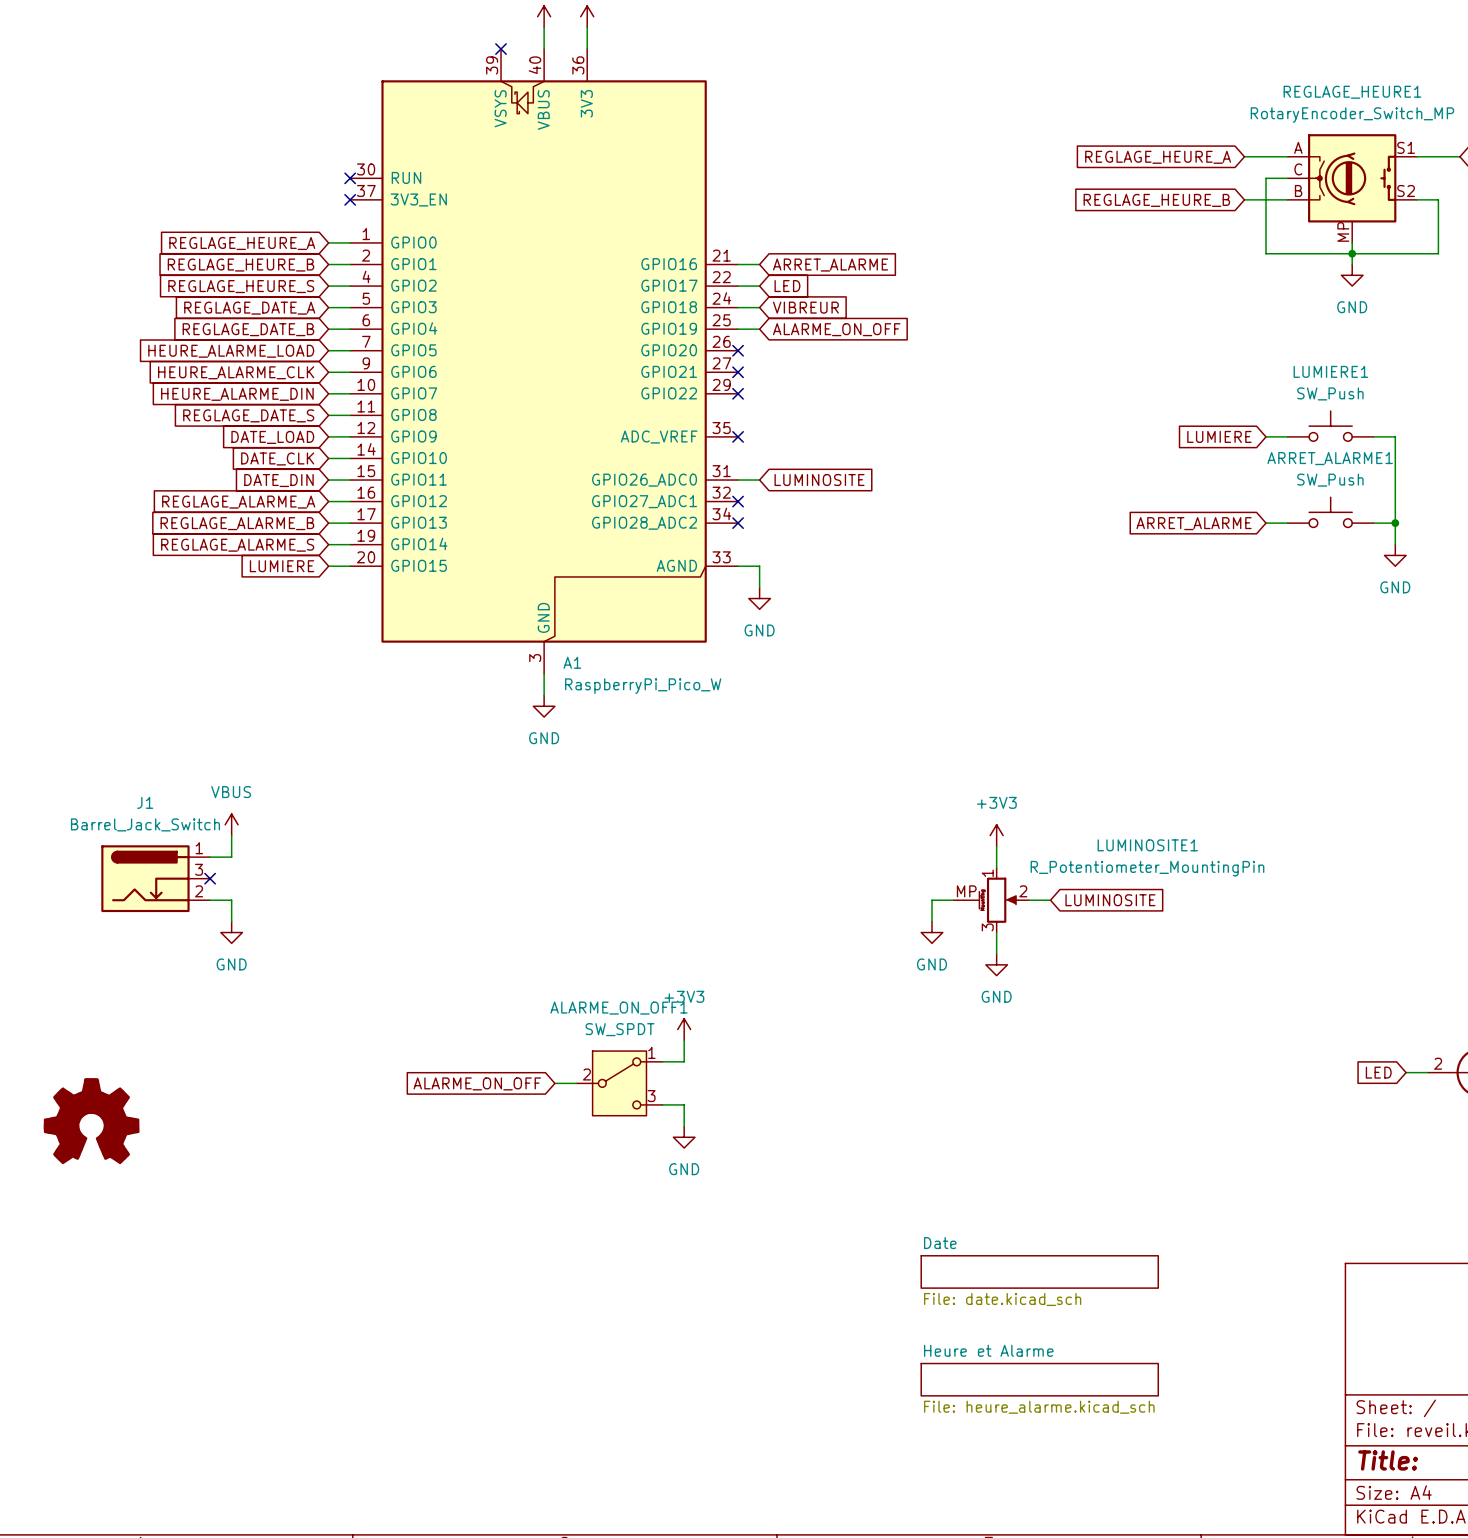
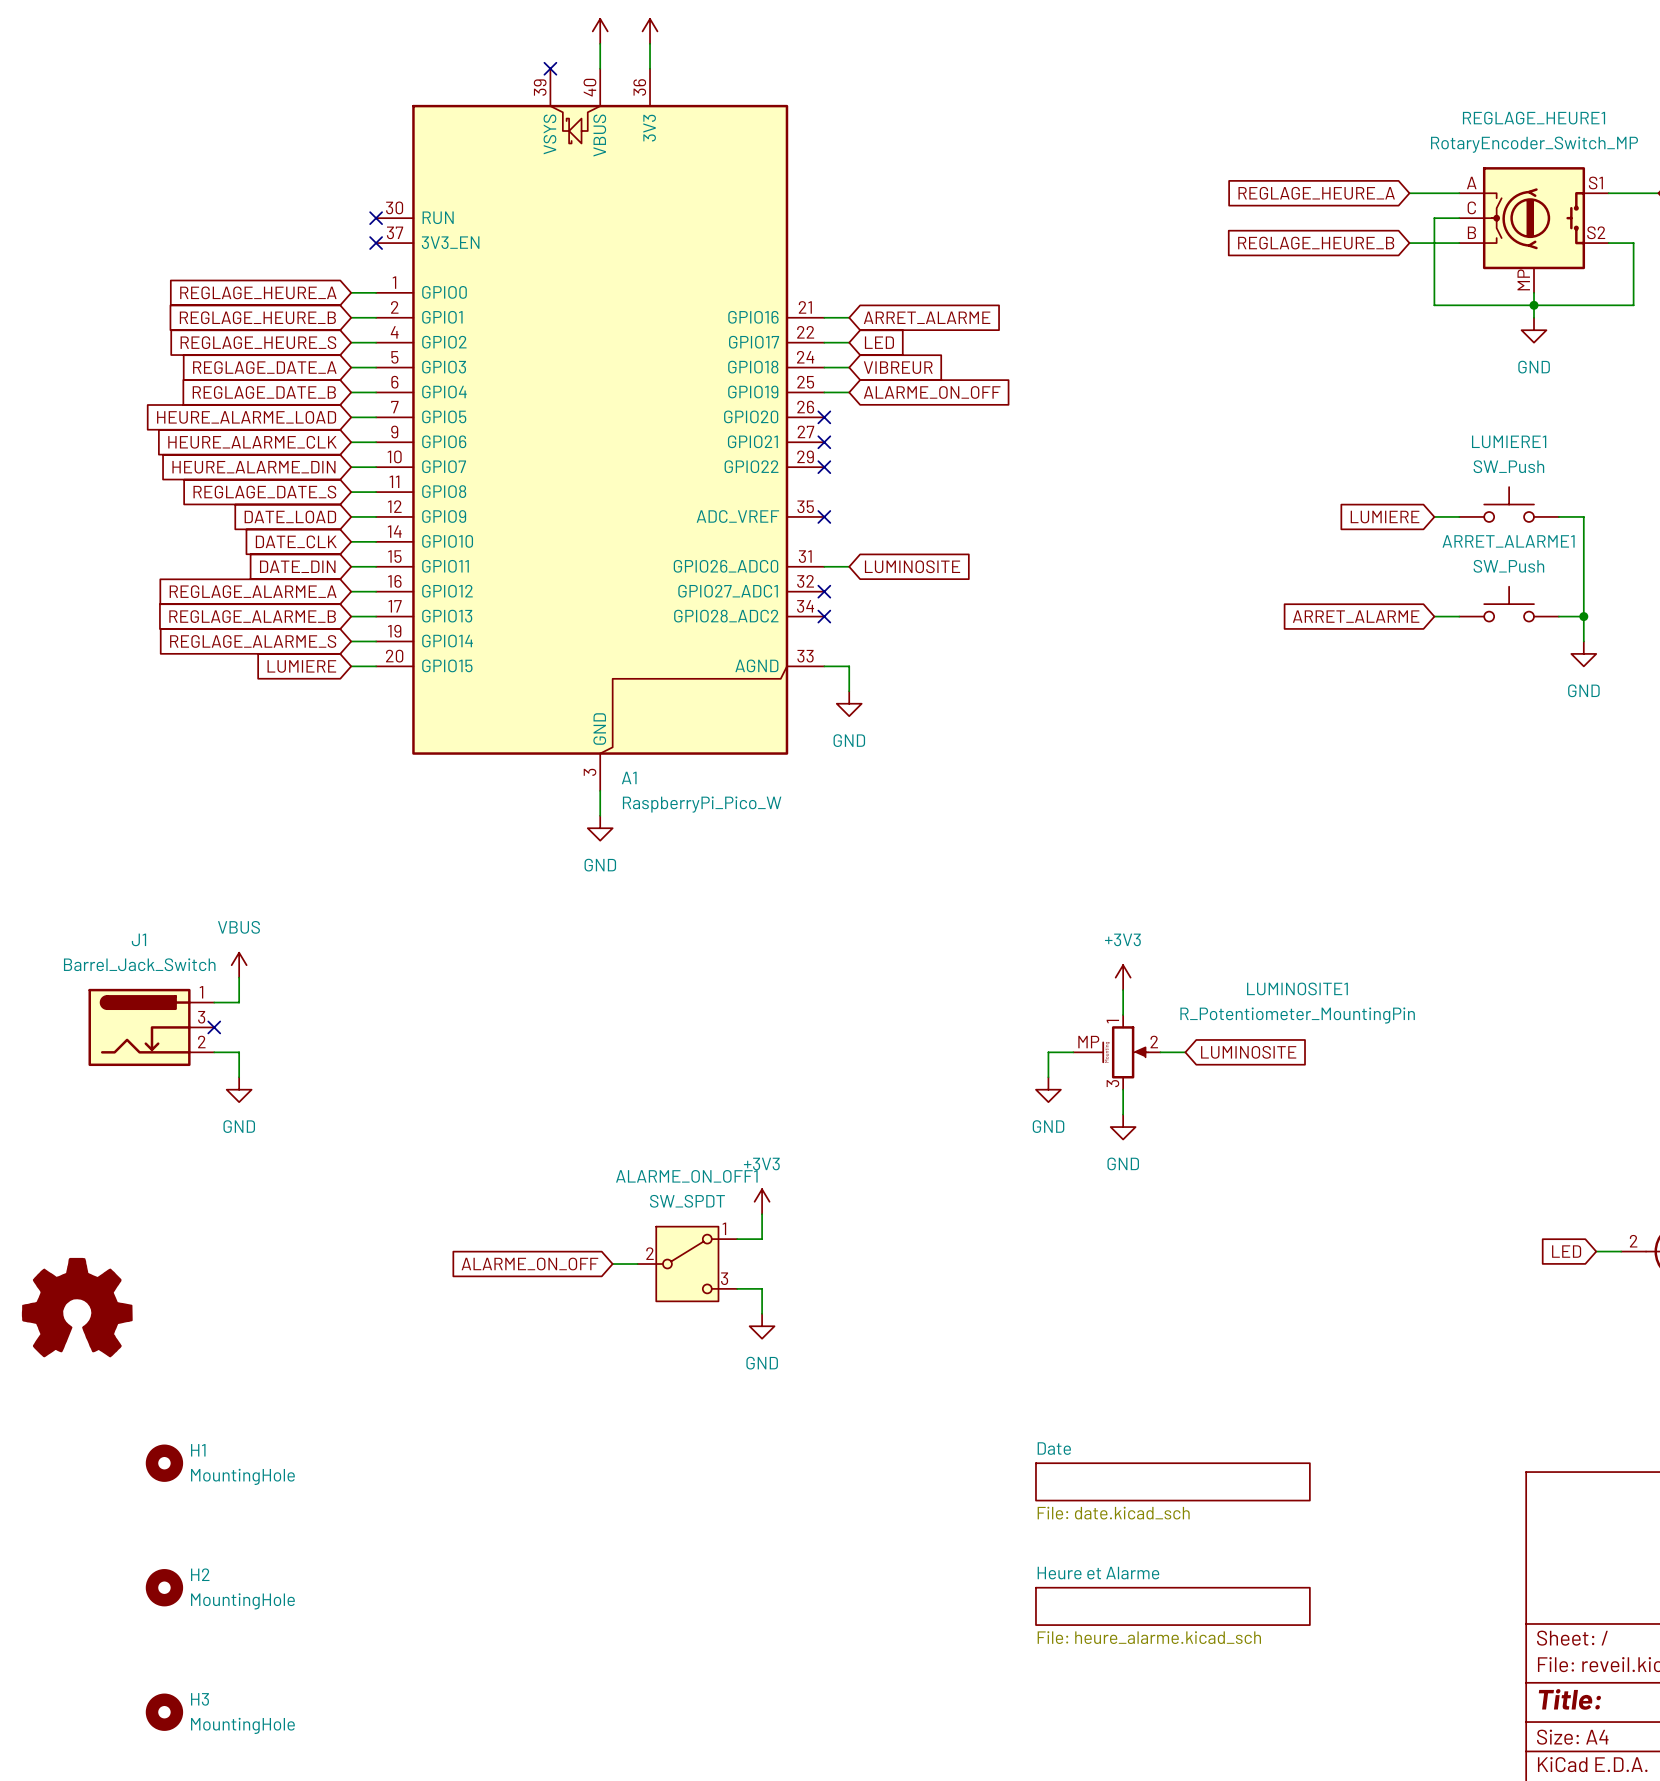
H1: none -> MountingHole (164, 1463)
H2: none -> MountingHole (164, 1587)
H3: none -> MountingHole (164, 1712)

